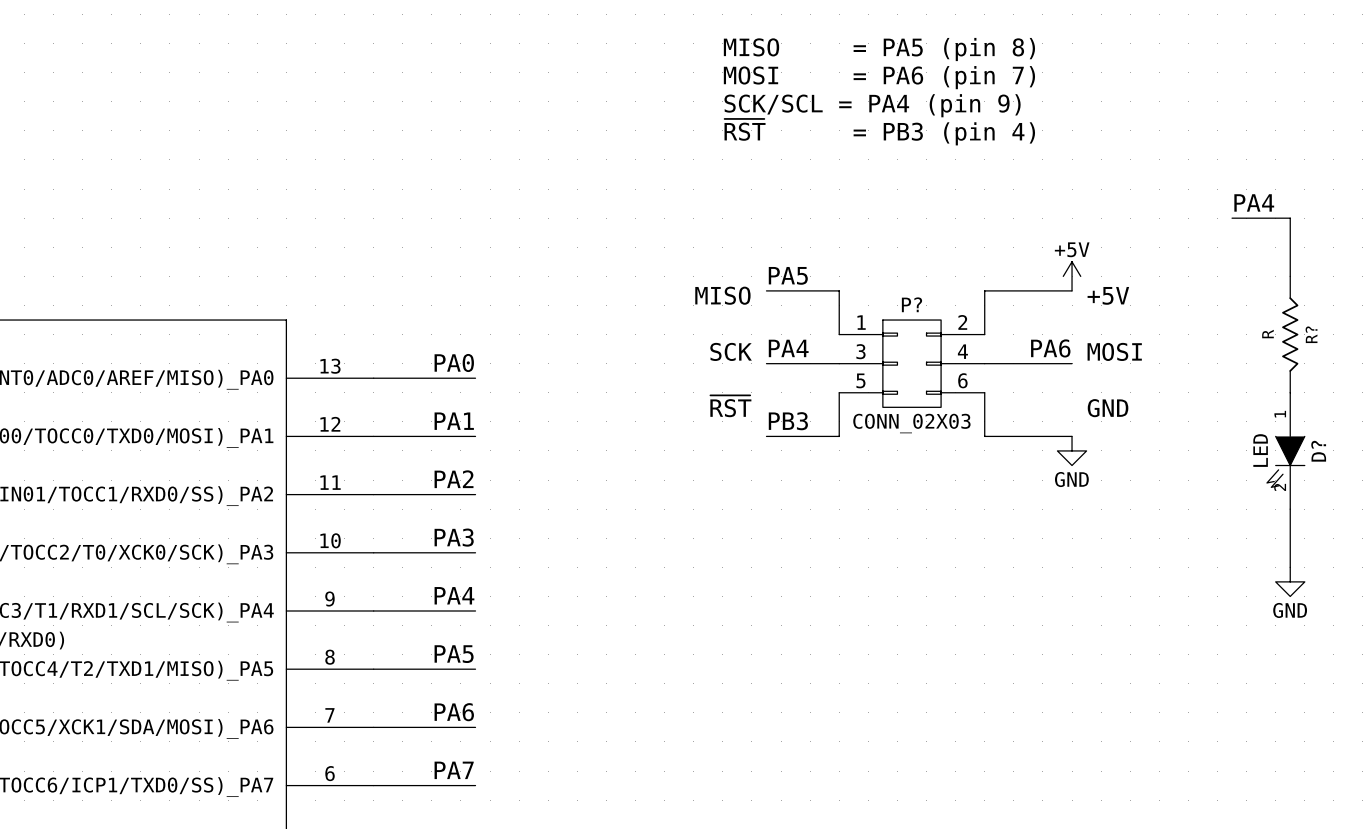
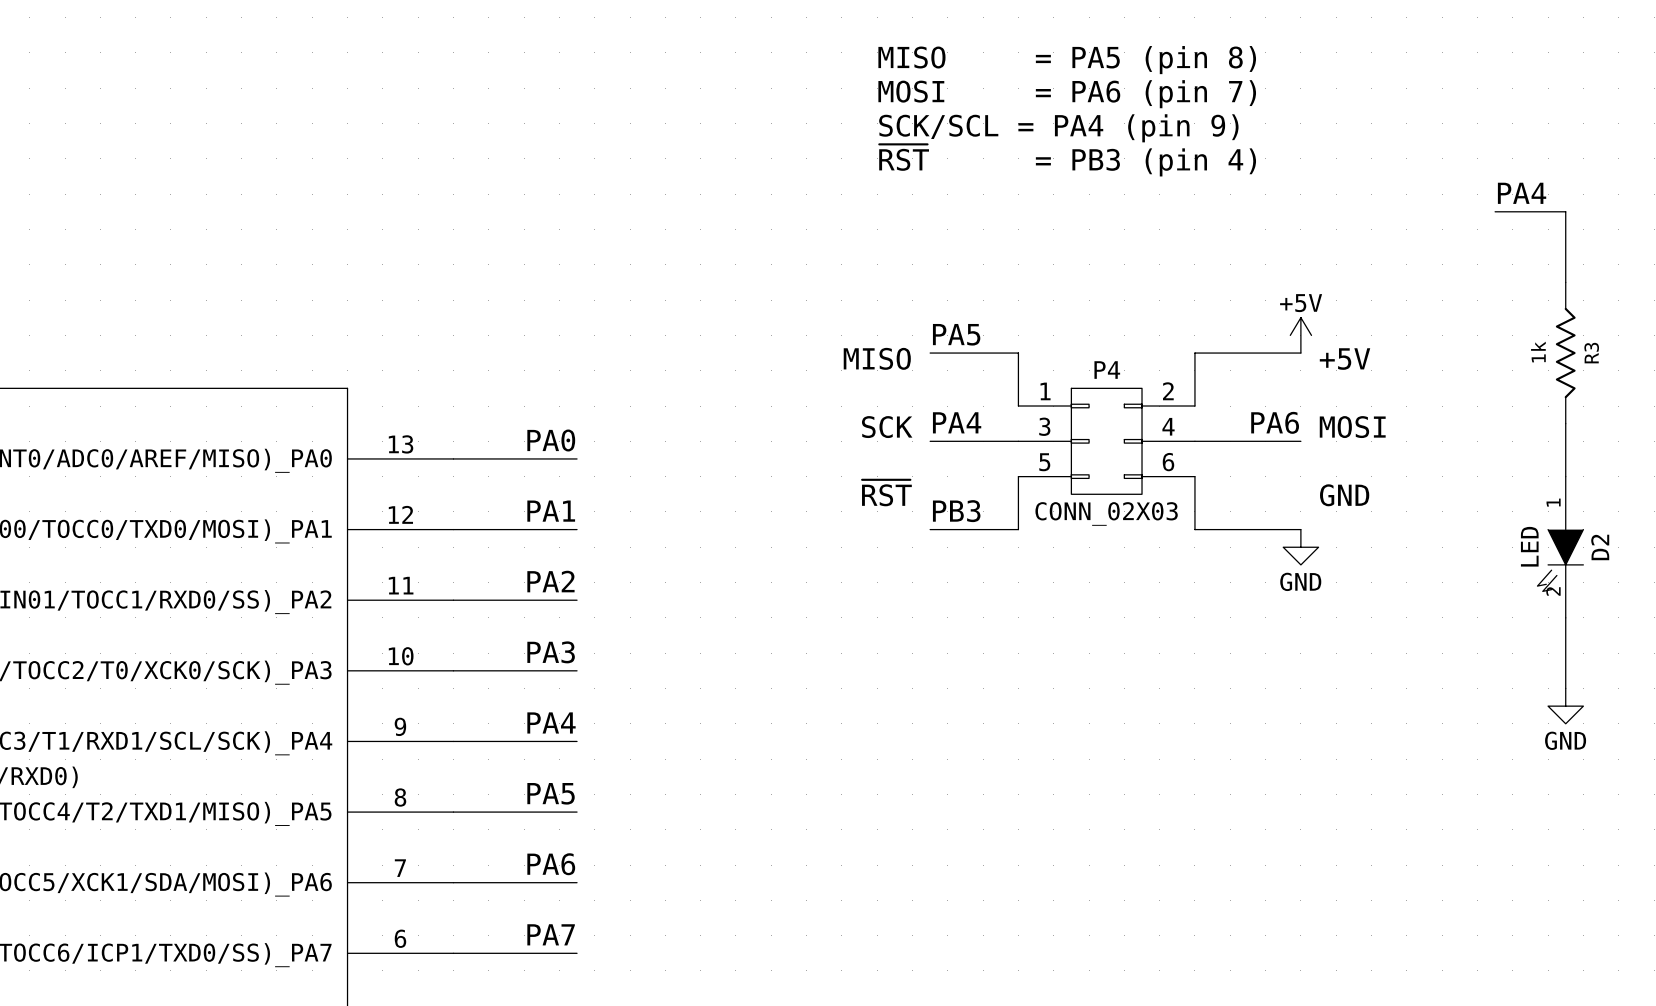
label position: PA4 (1254, 202) -> PA4 (1522, 193)
wire: (1232, 218) (1290, 218) -> (1495, 211) (1565, 211) (1565, 264)
R3: none -> 1k (1565, 353)
P? name: P? (912, 304) -> P4 (1107, 370)
R?: R (1290, 334) -> none
D? name: D? (1318, 451) -> D2 (1600, 547)

